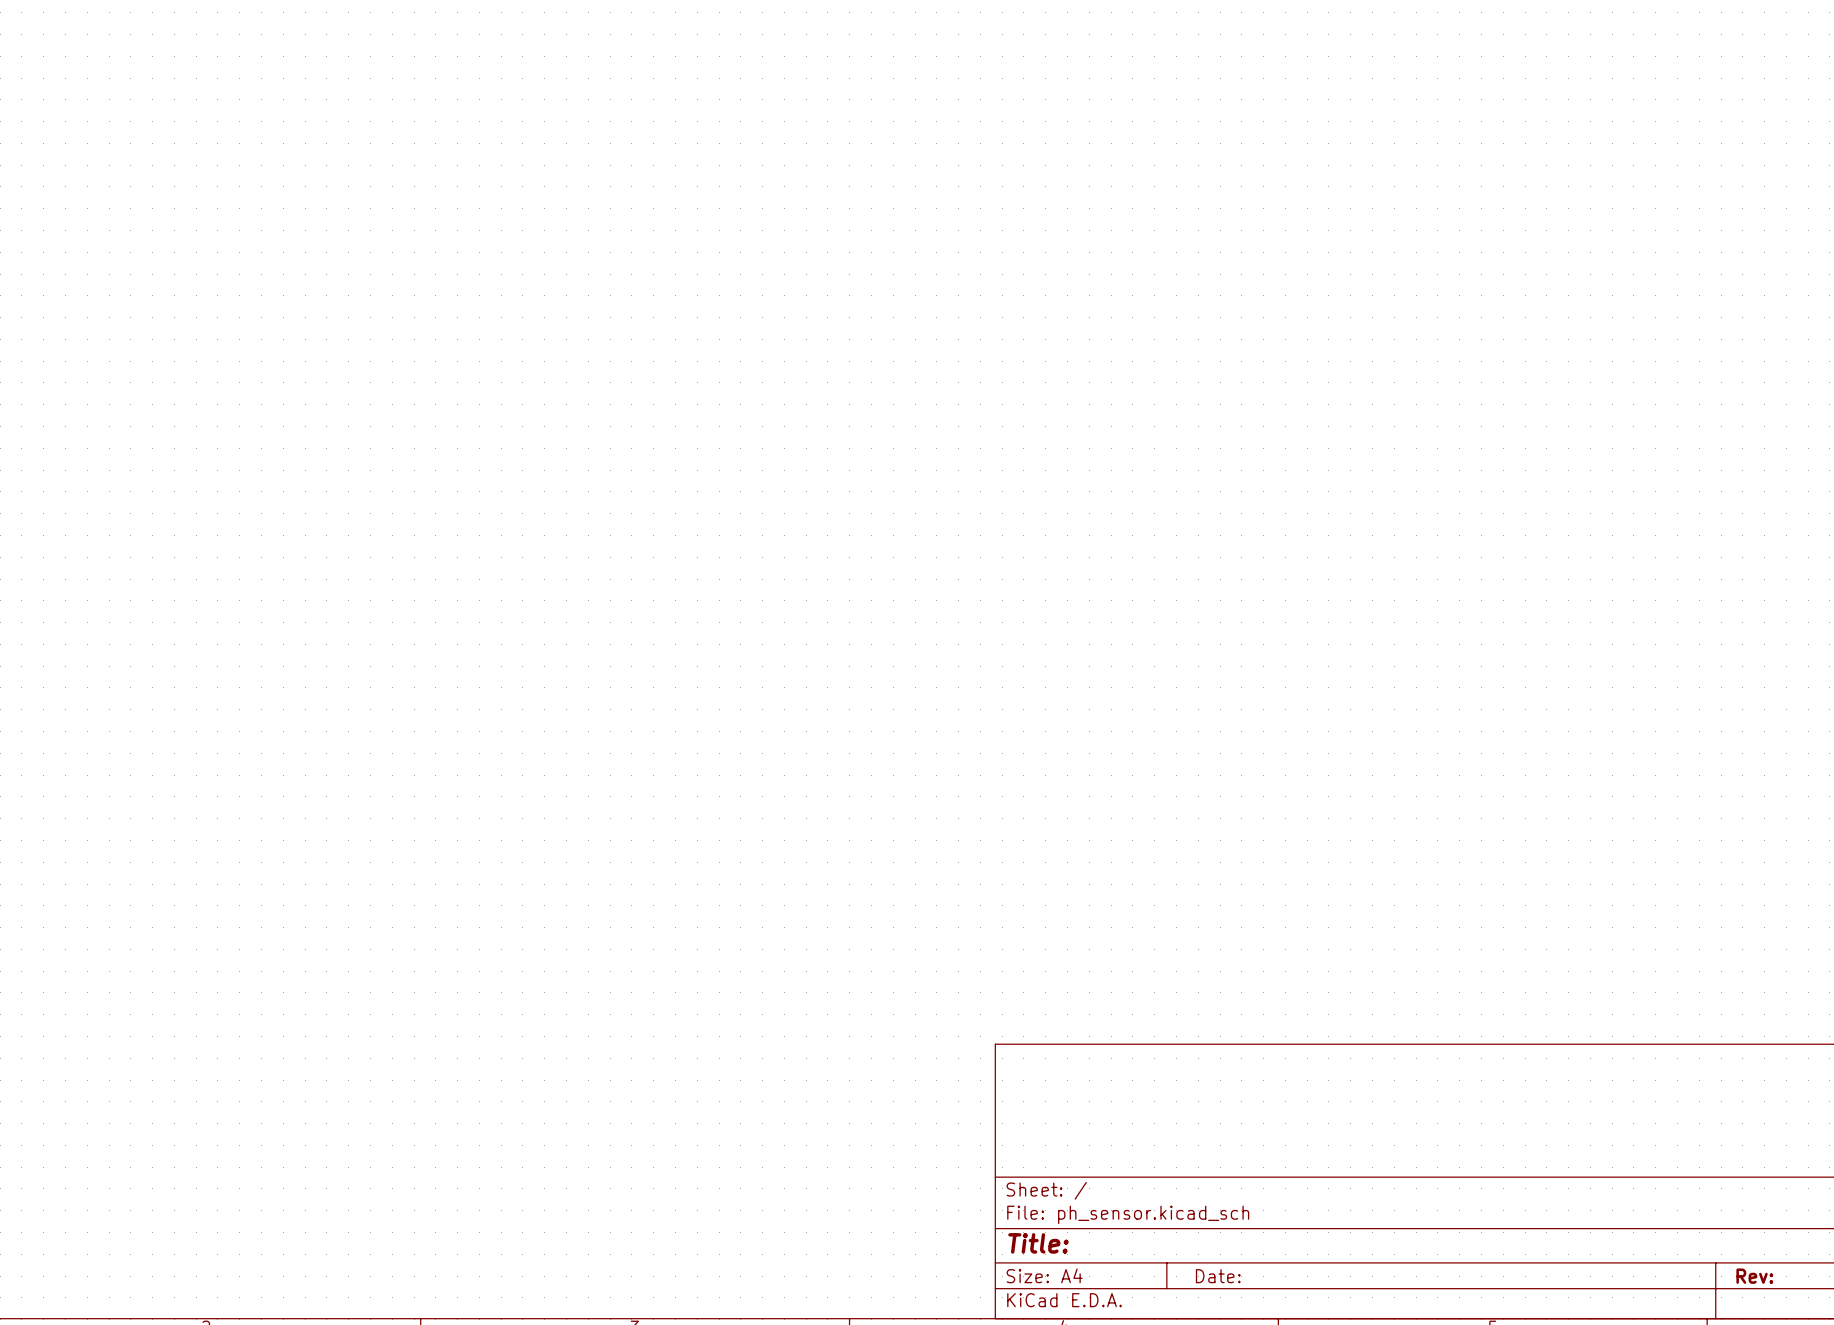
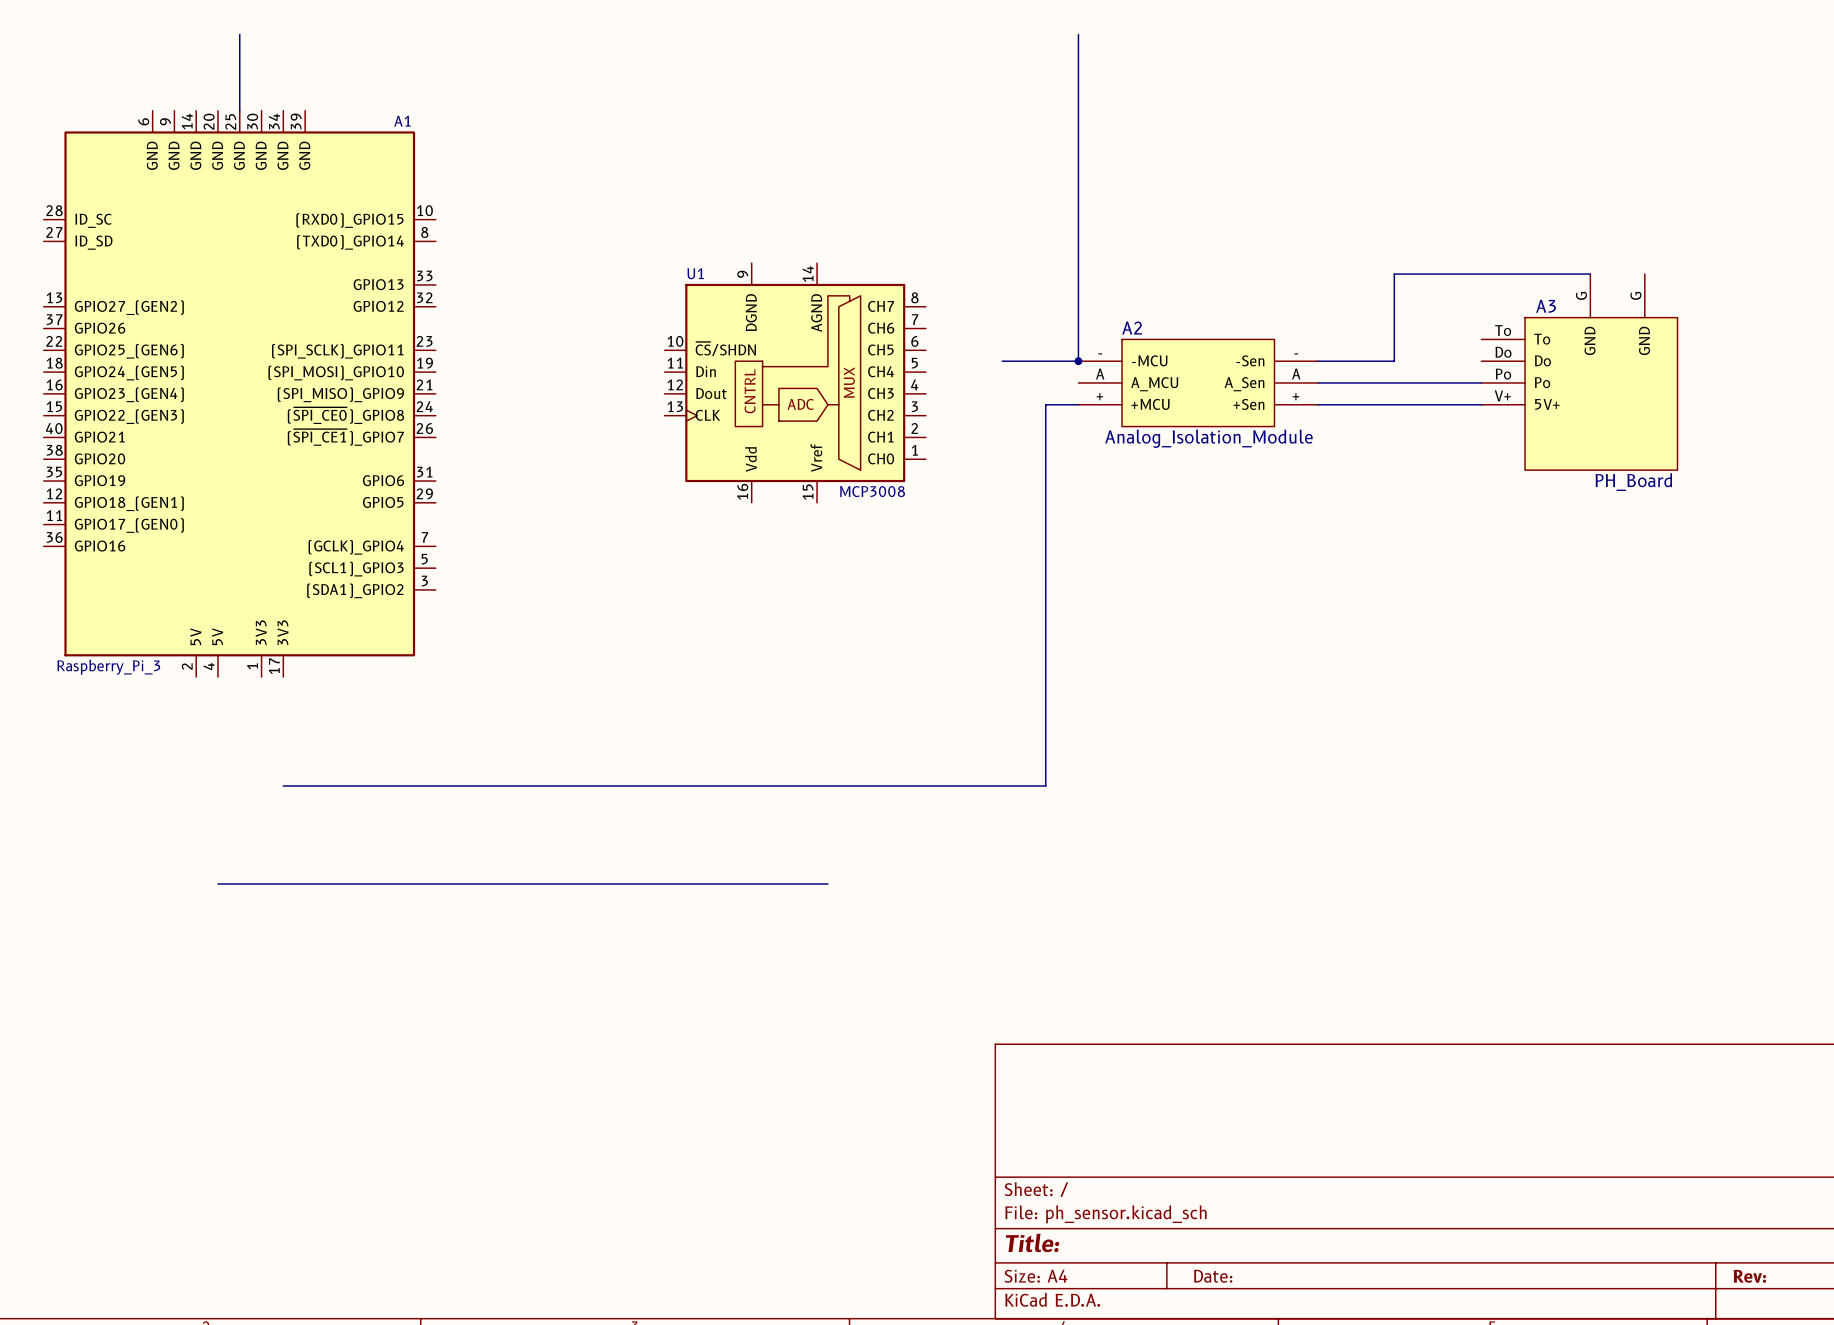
wire: none -> (239, 34) (239, 110)
wire: none -> (1078, 34) (1078, 361) (1002, 361)
wire: none -> (1590, 274) (1394, 274) (1394, 361) (1318, 361)
junction: none -> (1078, 361)
A3: none -> PH_Board (1579, 372)
U1: none -> MCP3008 (795, 382)
A2: none -> Analog_Isolation_Module (1198, 382)
wire: none -> (1318, 382) (1481, 382)
A1: none -> Raspberry_Pi_3 (239, 393)
wire: none -> (1078, 404) (1045, 404) (1045, 785) (283, 785)
wire: none -> (1318, 404) (1481, 404)
wire: none -> (217, 884) (827, 884)

